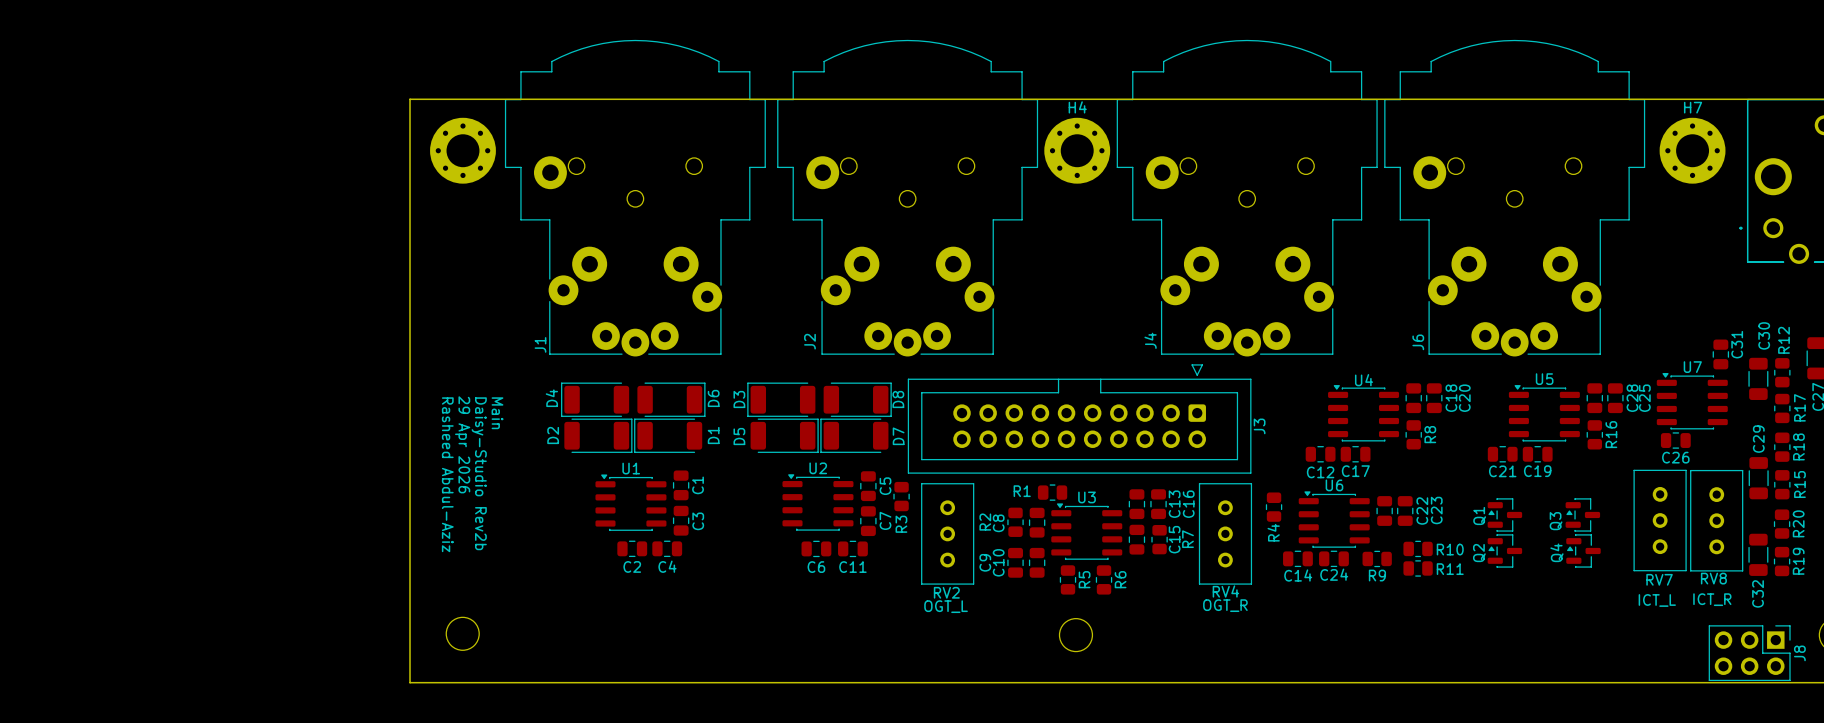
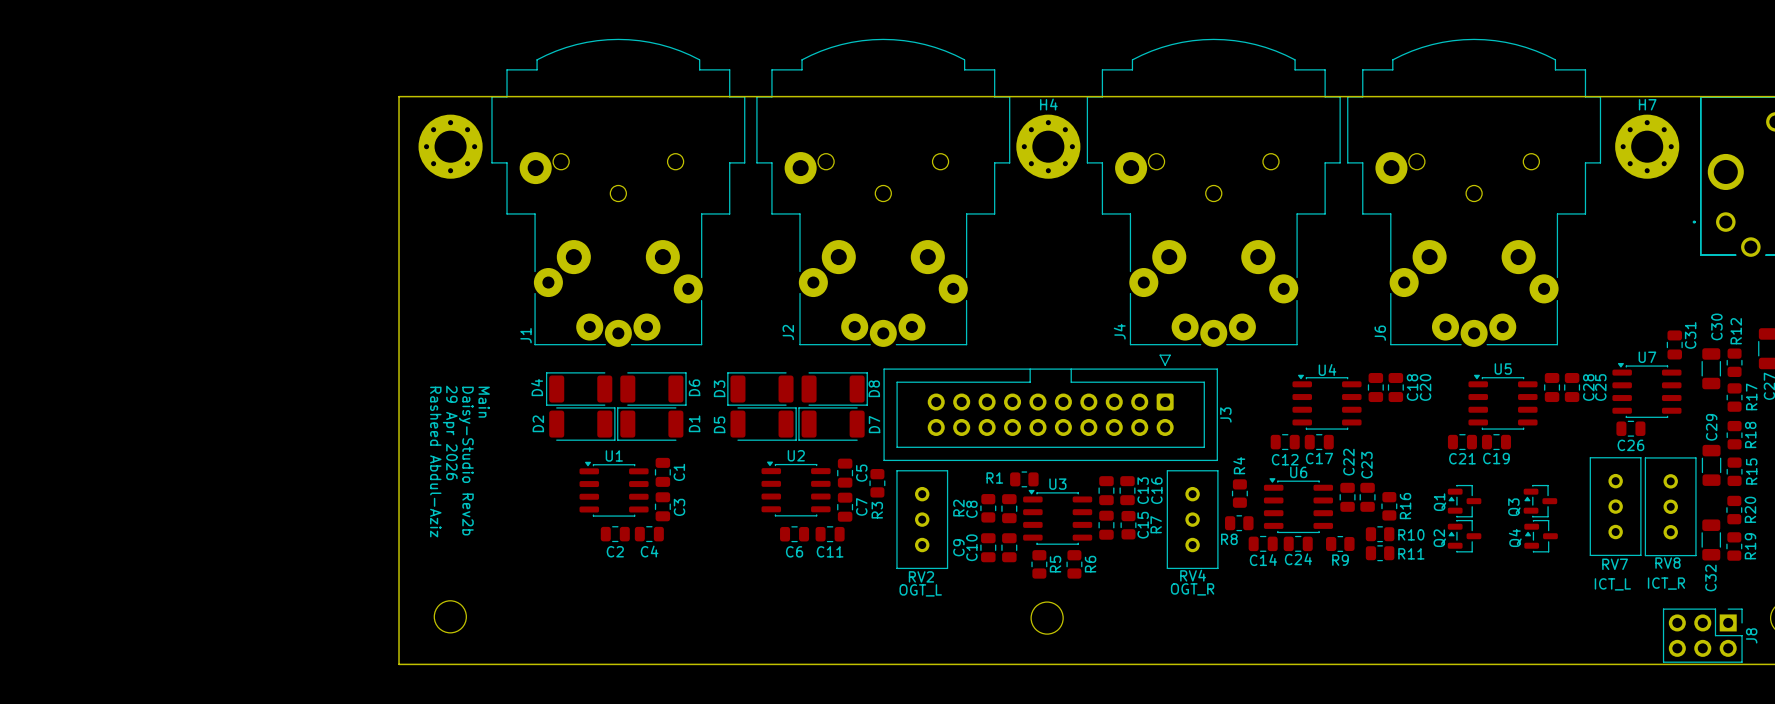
R8 rotation: 0° (1413, 434) -> 90° clockwise (1239, 523)
R8 position: (1413, 434) -> (1239, 523)
R16 position: (1594, 434) -> (1389, 506)
C23 name position: C23 (1436, 510) -> C23 (1366, 465)
C22 name position: C22 (1422, 511) -> C22 (1348, 462)
R4 name position: R4 (1273, 532) -> R4 (1239, 465)

